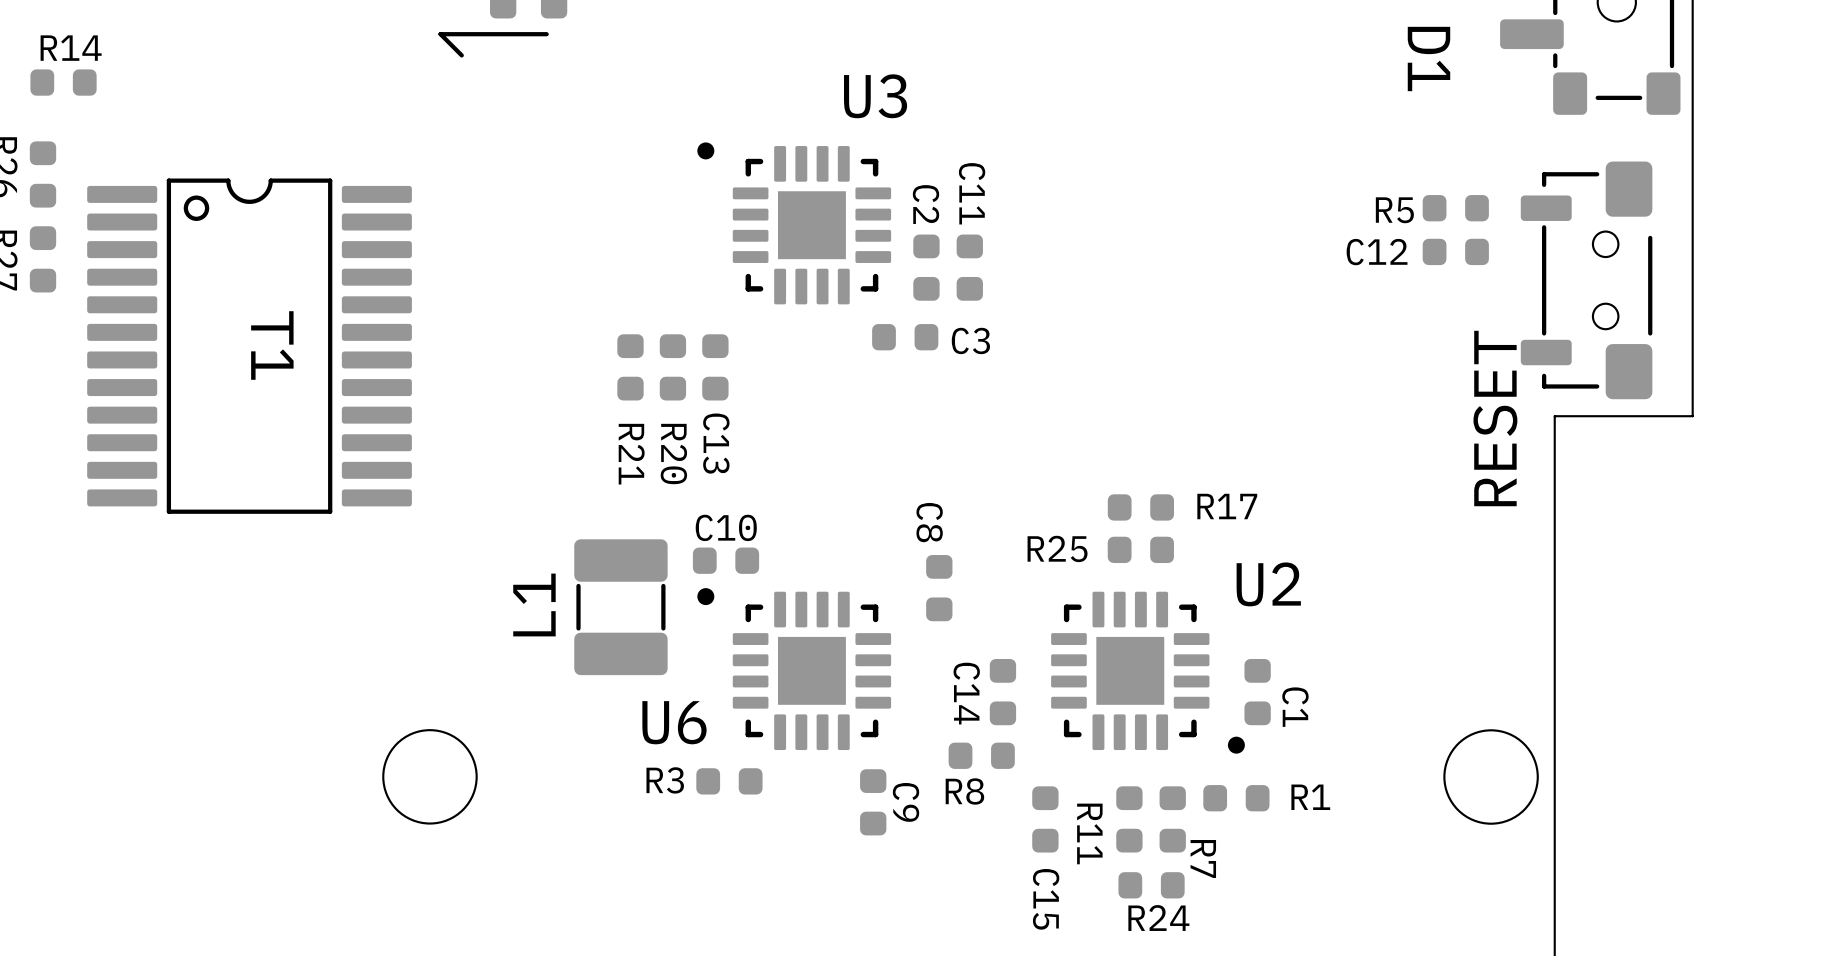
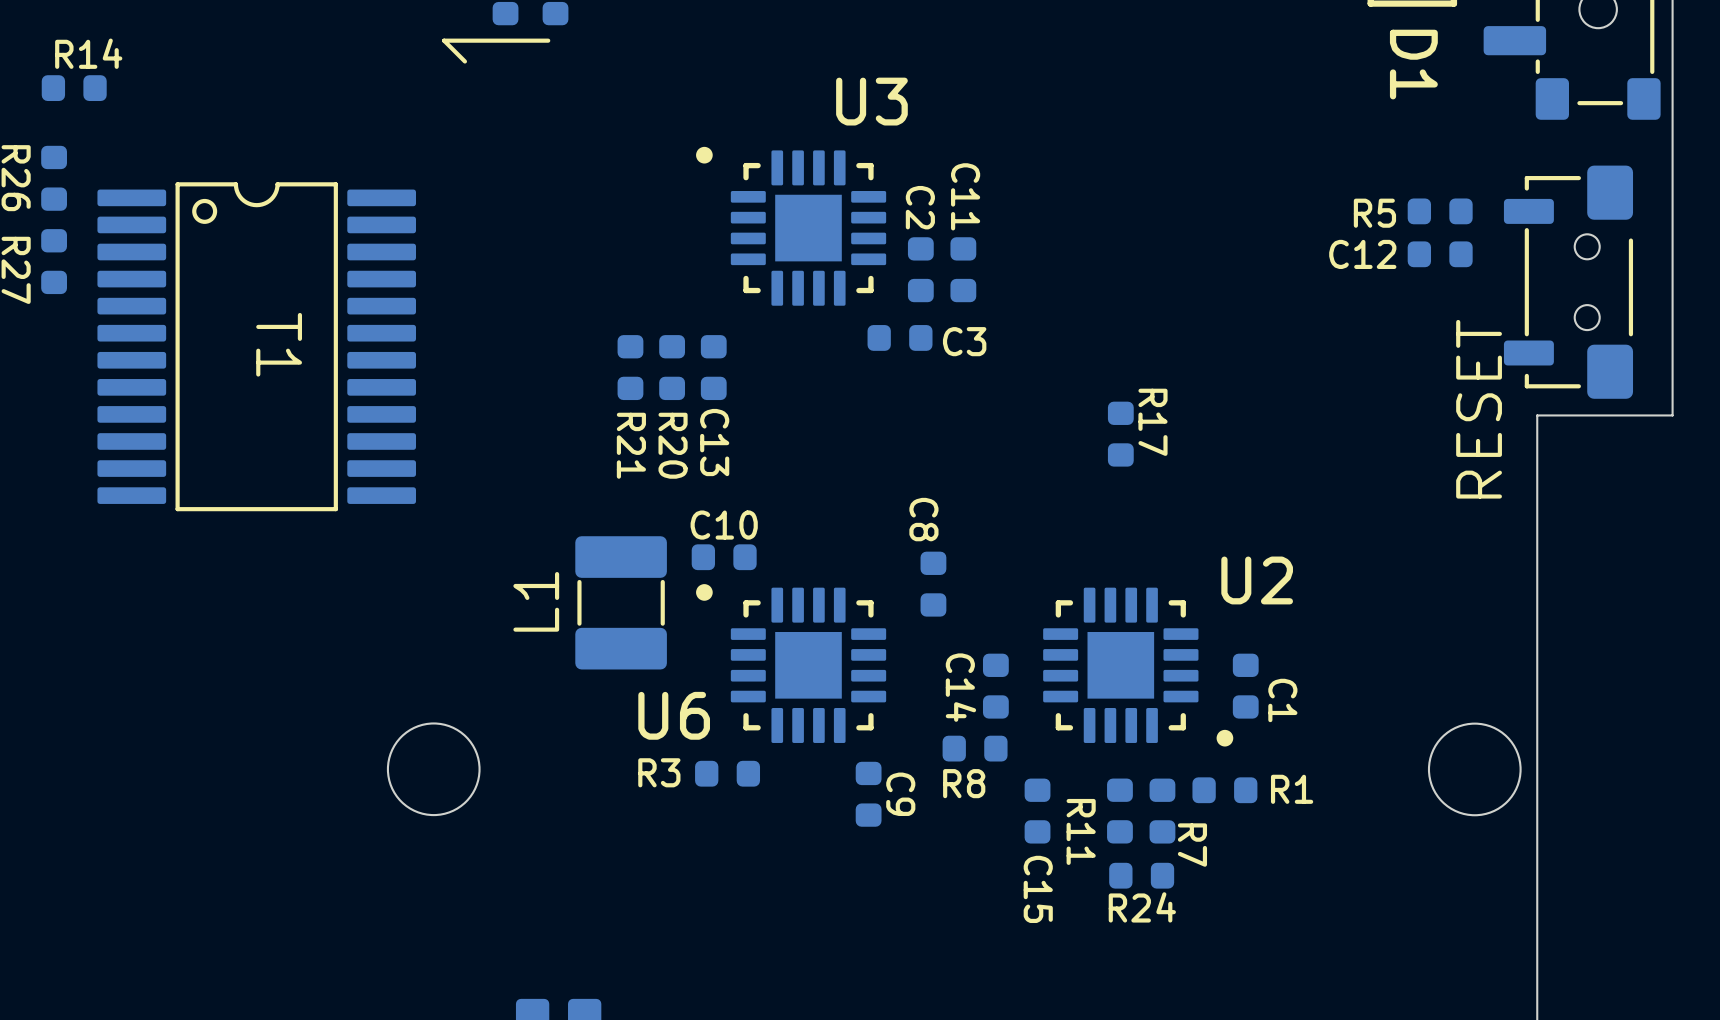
R17 rotation: 0° (1140, 507) -> 90° clockwise (1120, 434)
R17 position: (1140, 507) -> (1120, 434)
R25: (1140, 549) -> none

